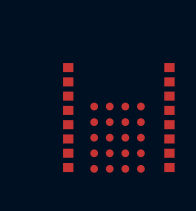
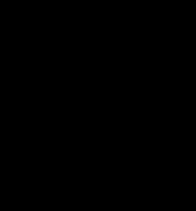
part: (118, 117) -> none

